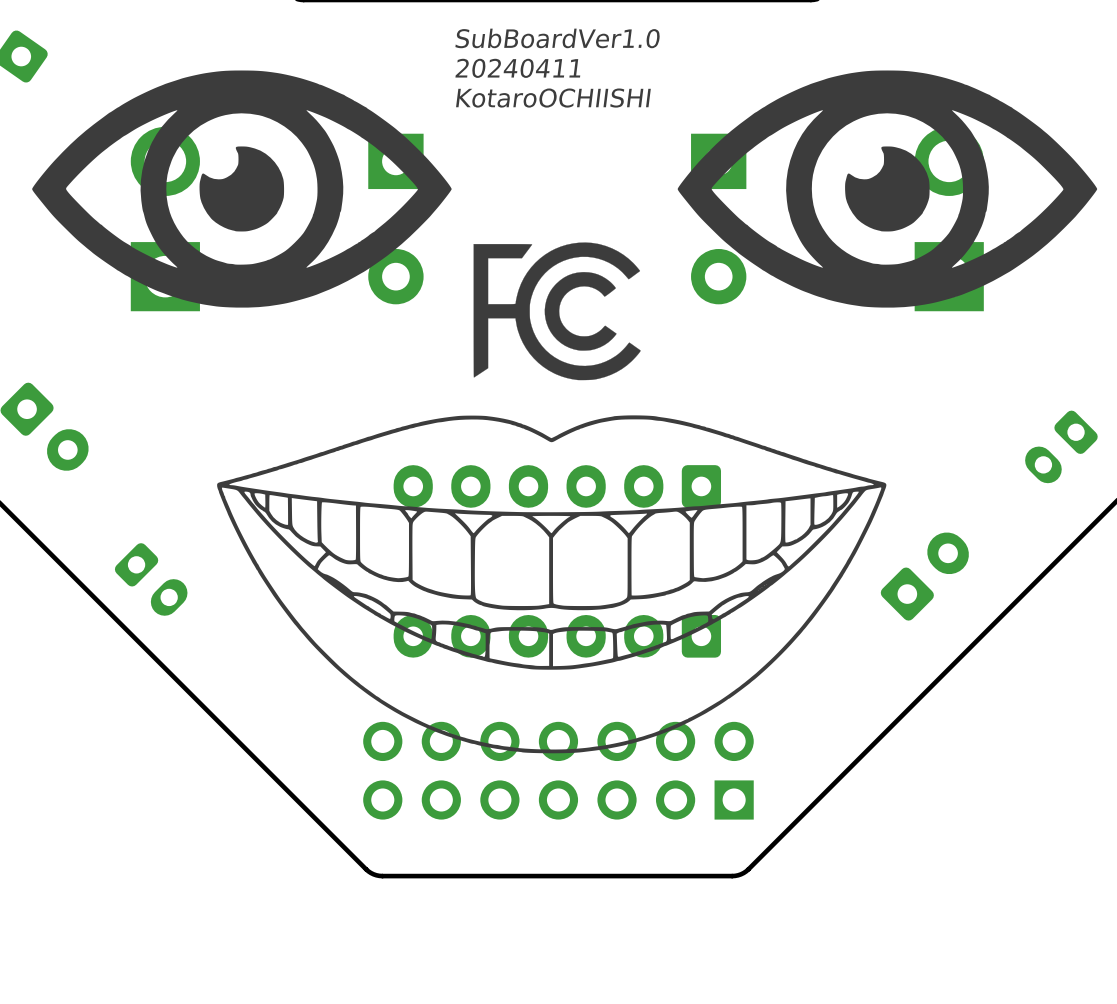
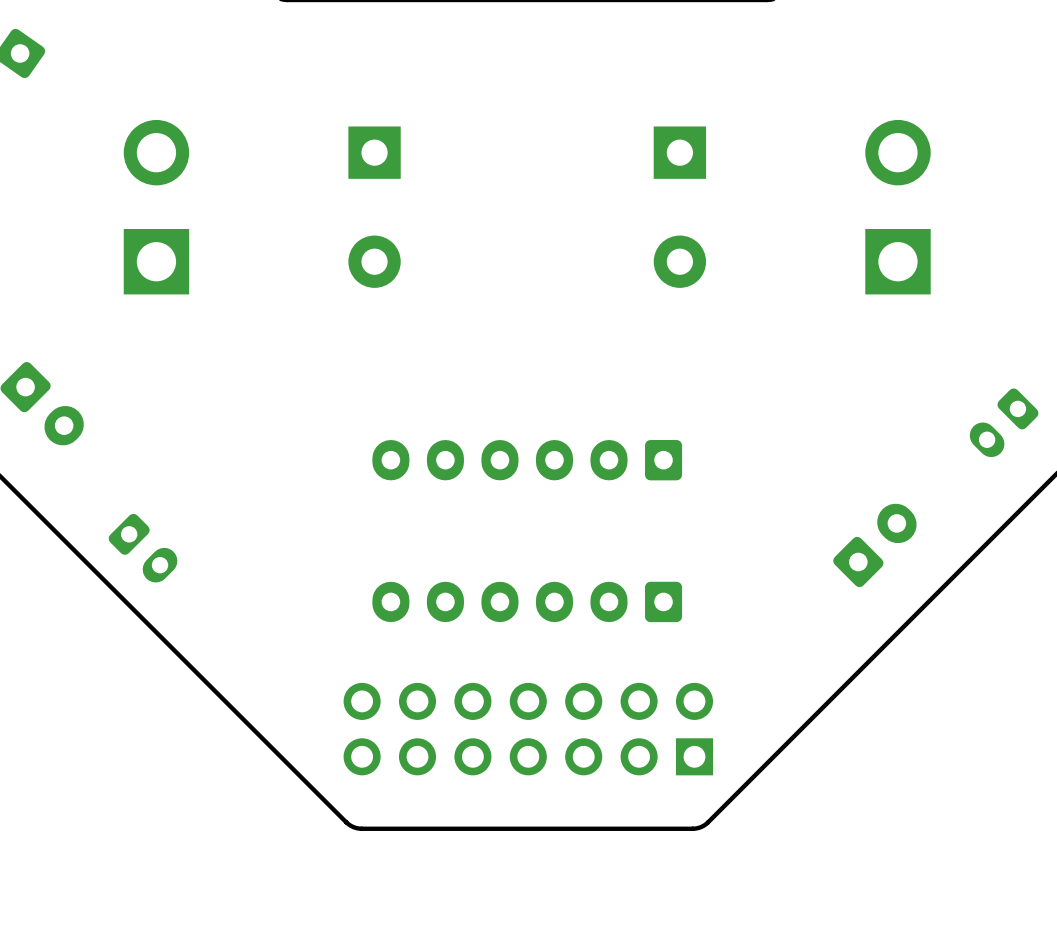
text: SubBoardVer1.0 (557, 38) -> none
text: 20240411 (517, 68) -> none
drawing: [32, 70, 641, 381] -> none
drawing: [677, 70, 1098, 308] -> none
text: KotaroOCHIISHI (553, 98) -> none
drawing: [217, 415, 887, 754] -> none

